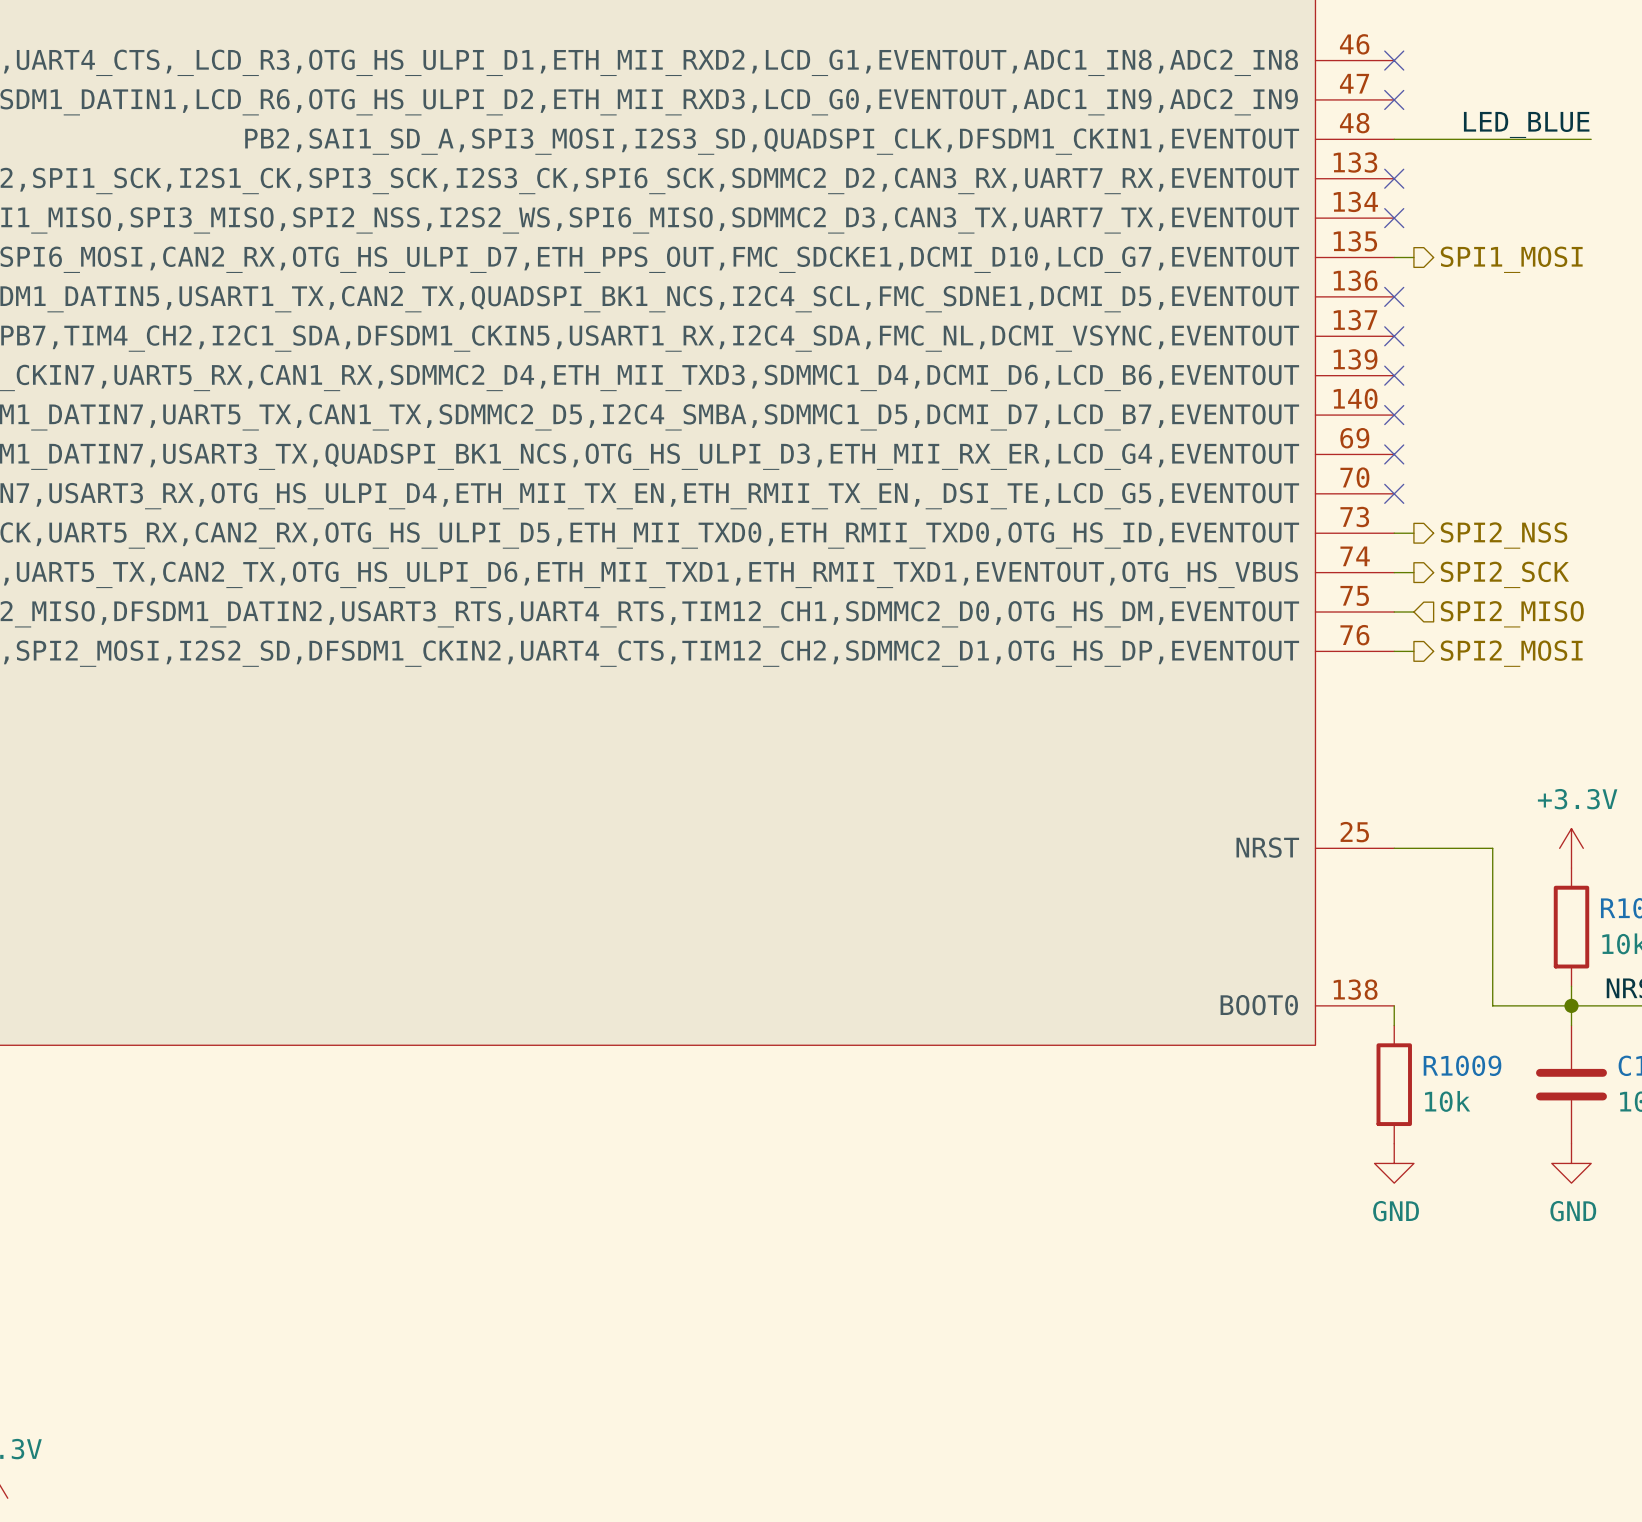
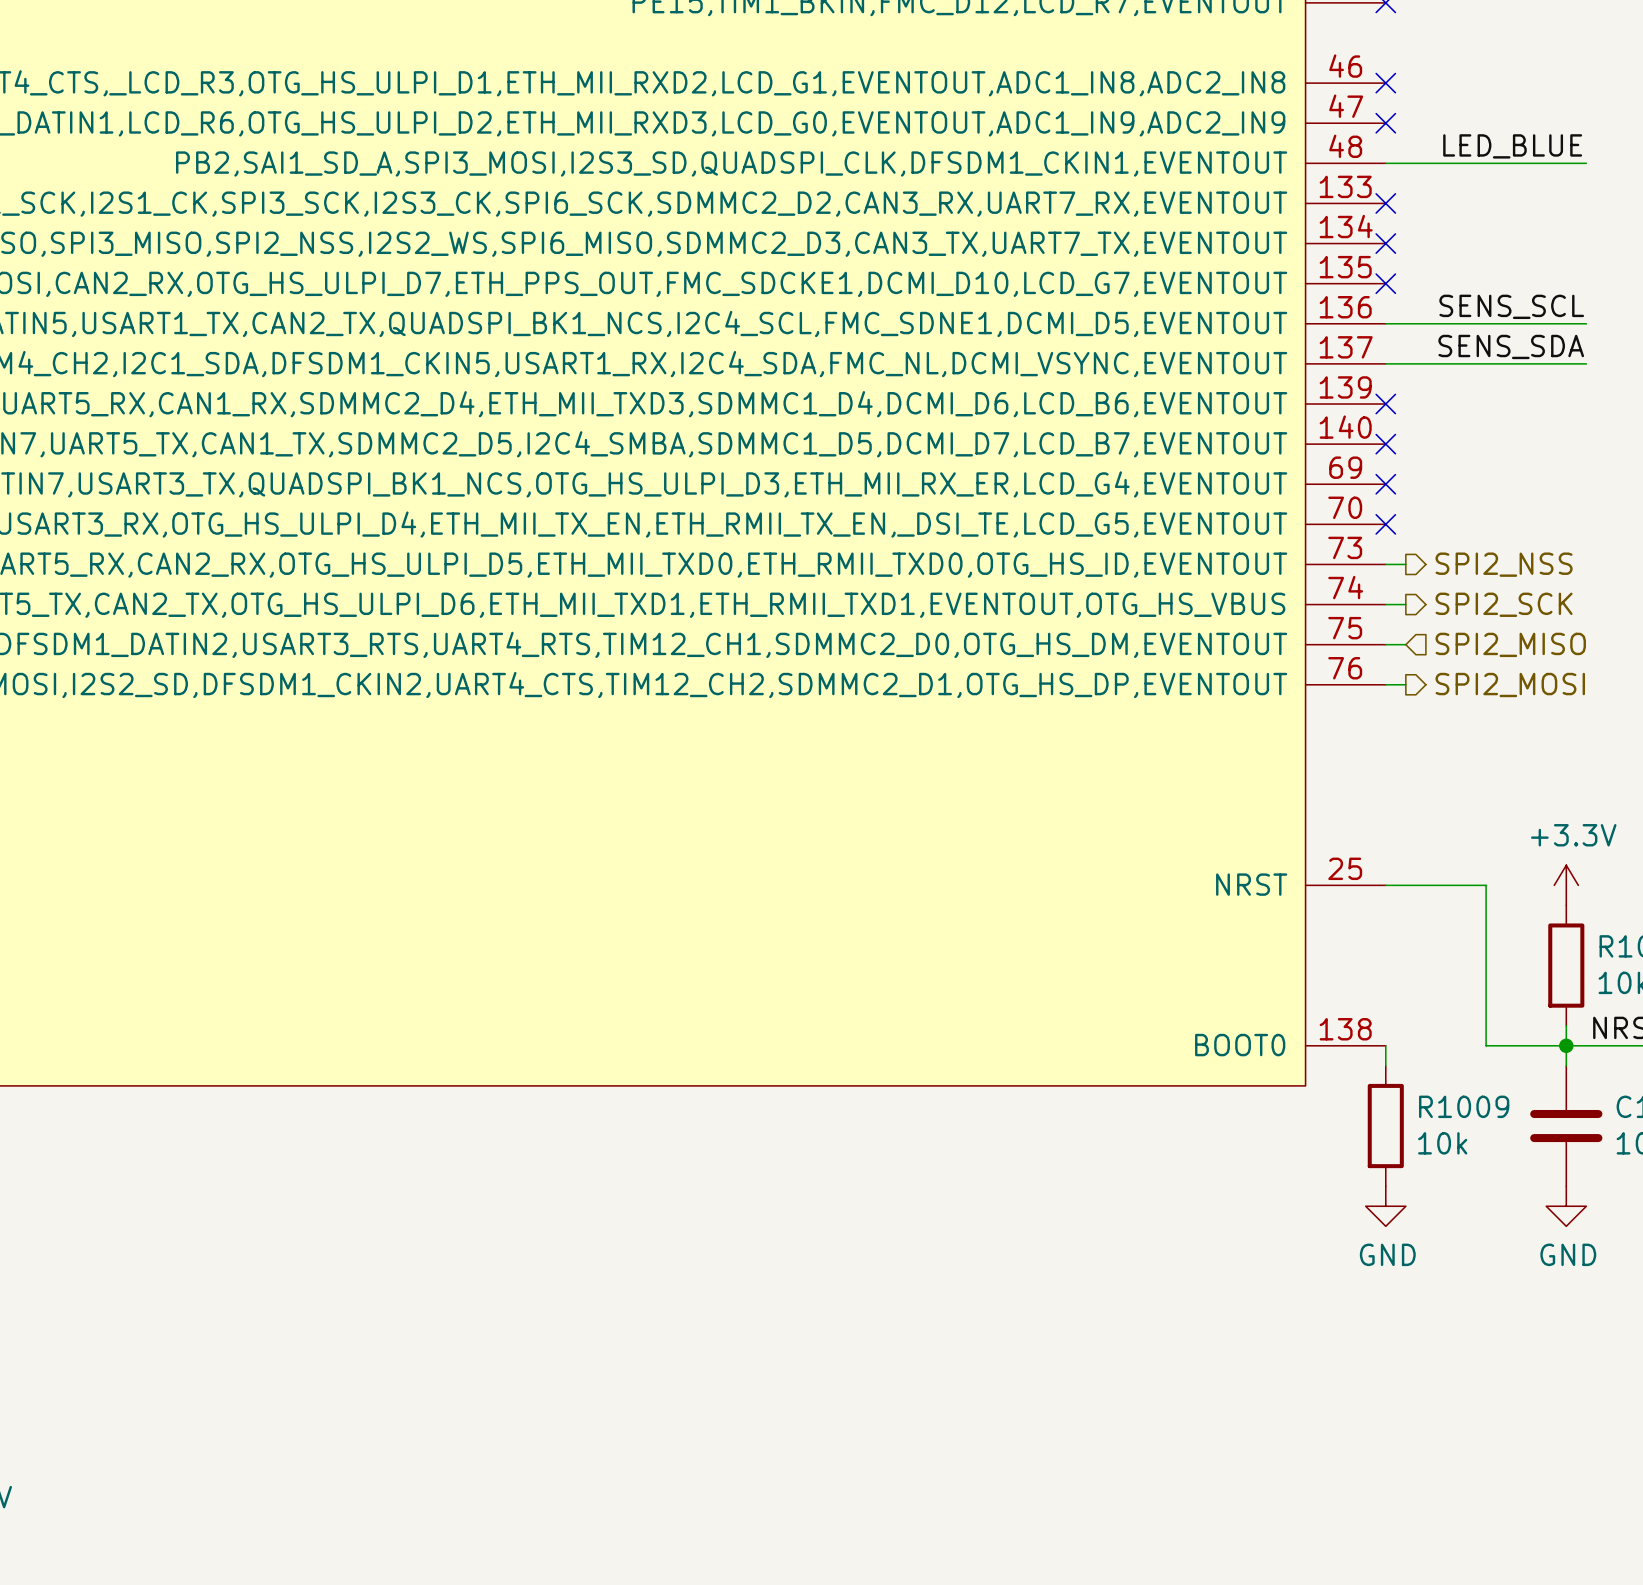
wire: (1394, 257) (1413, 257) -> none
no-connect mark: none -> (1385, 283)
hierarchical label: SPI1_MOSI (1511, 259) -> none
label: none -> SENS_SCL (1511, 306)
wire: none -> (1385, 323) (1586, 323)
no-connect mark: (1394, 296) -> none
label: none -> SENS_SDA (1511, 346)
wire: none -> (1385, 363) (1586, 363)
no-connect mark: (1394, 336) -> none

